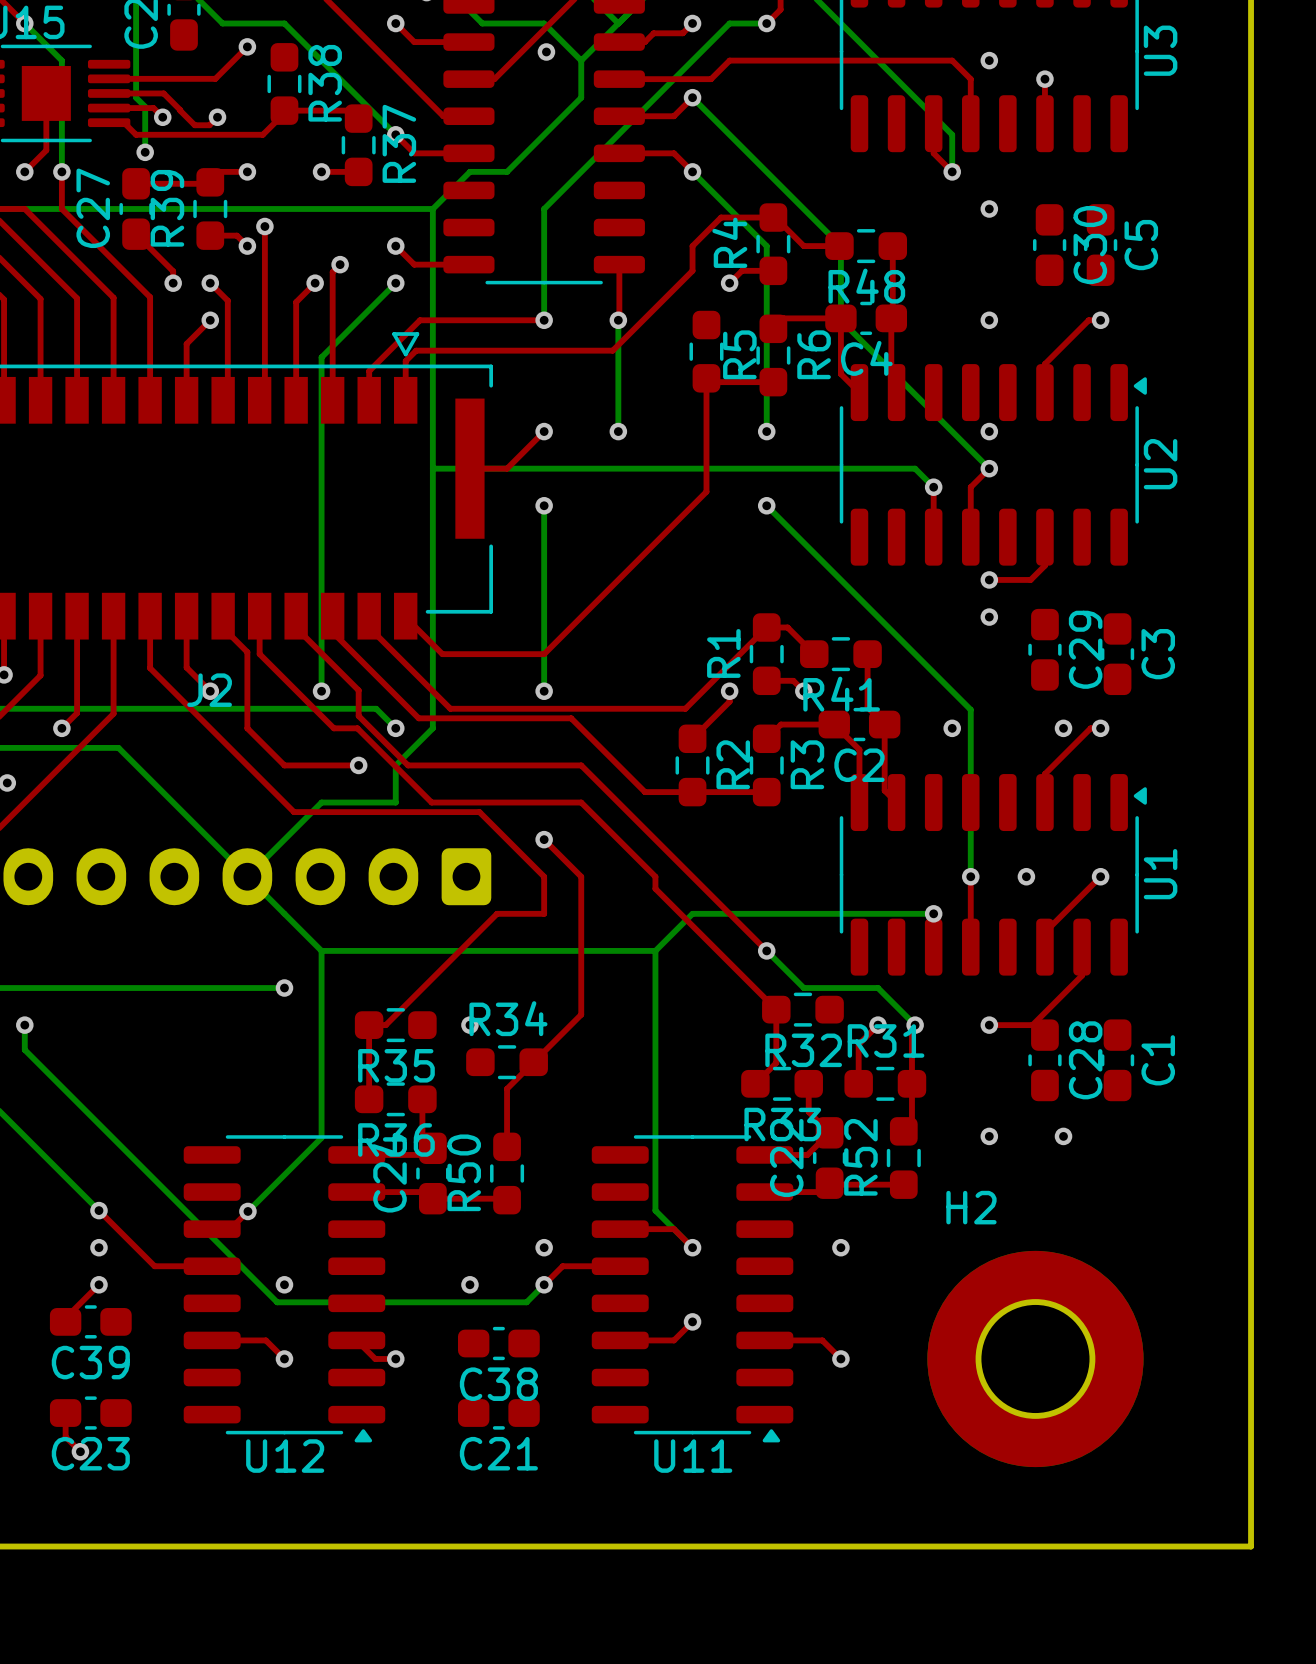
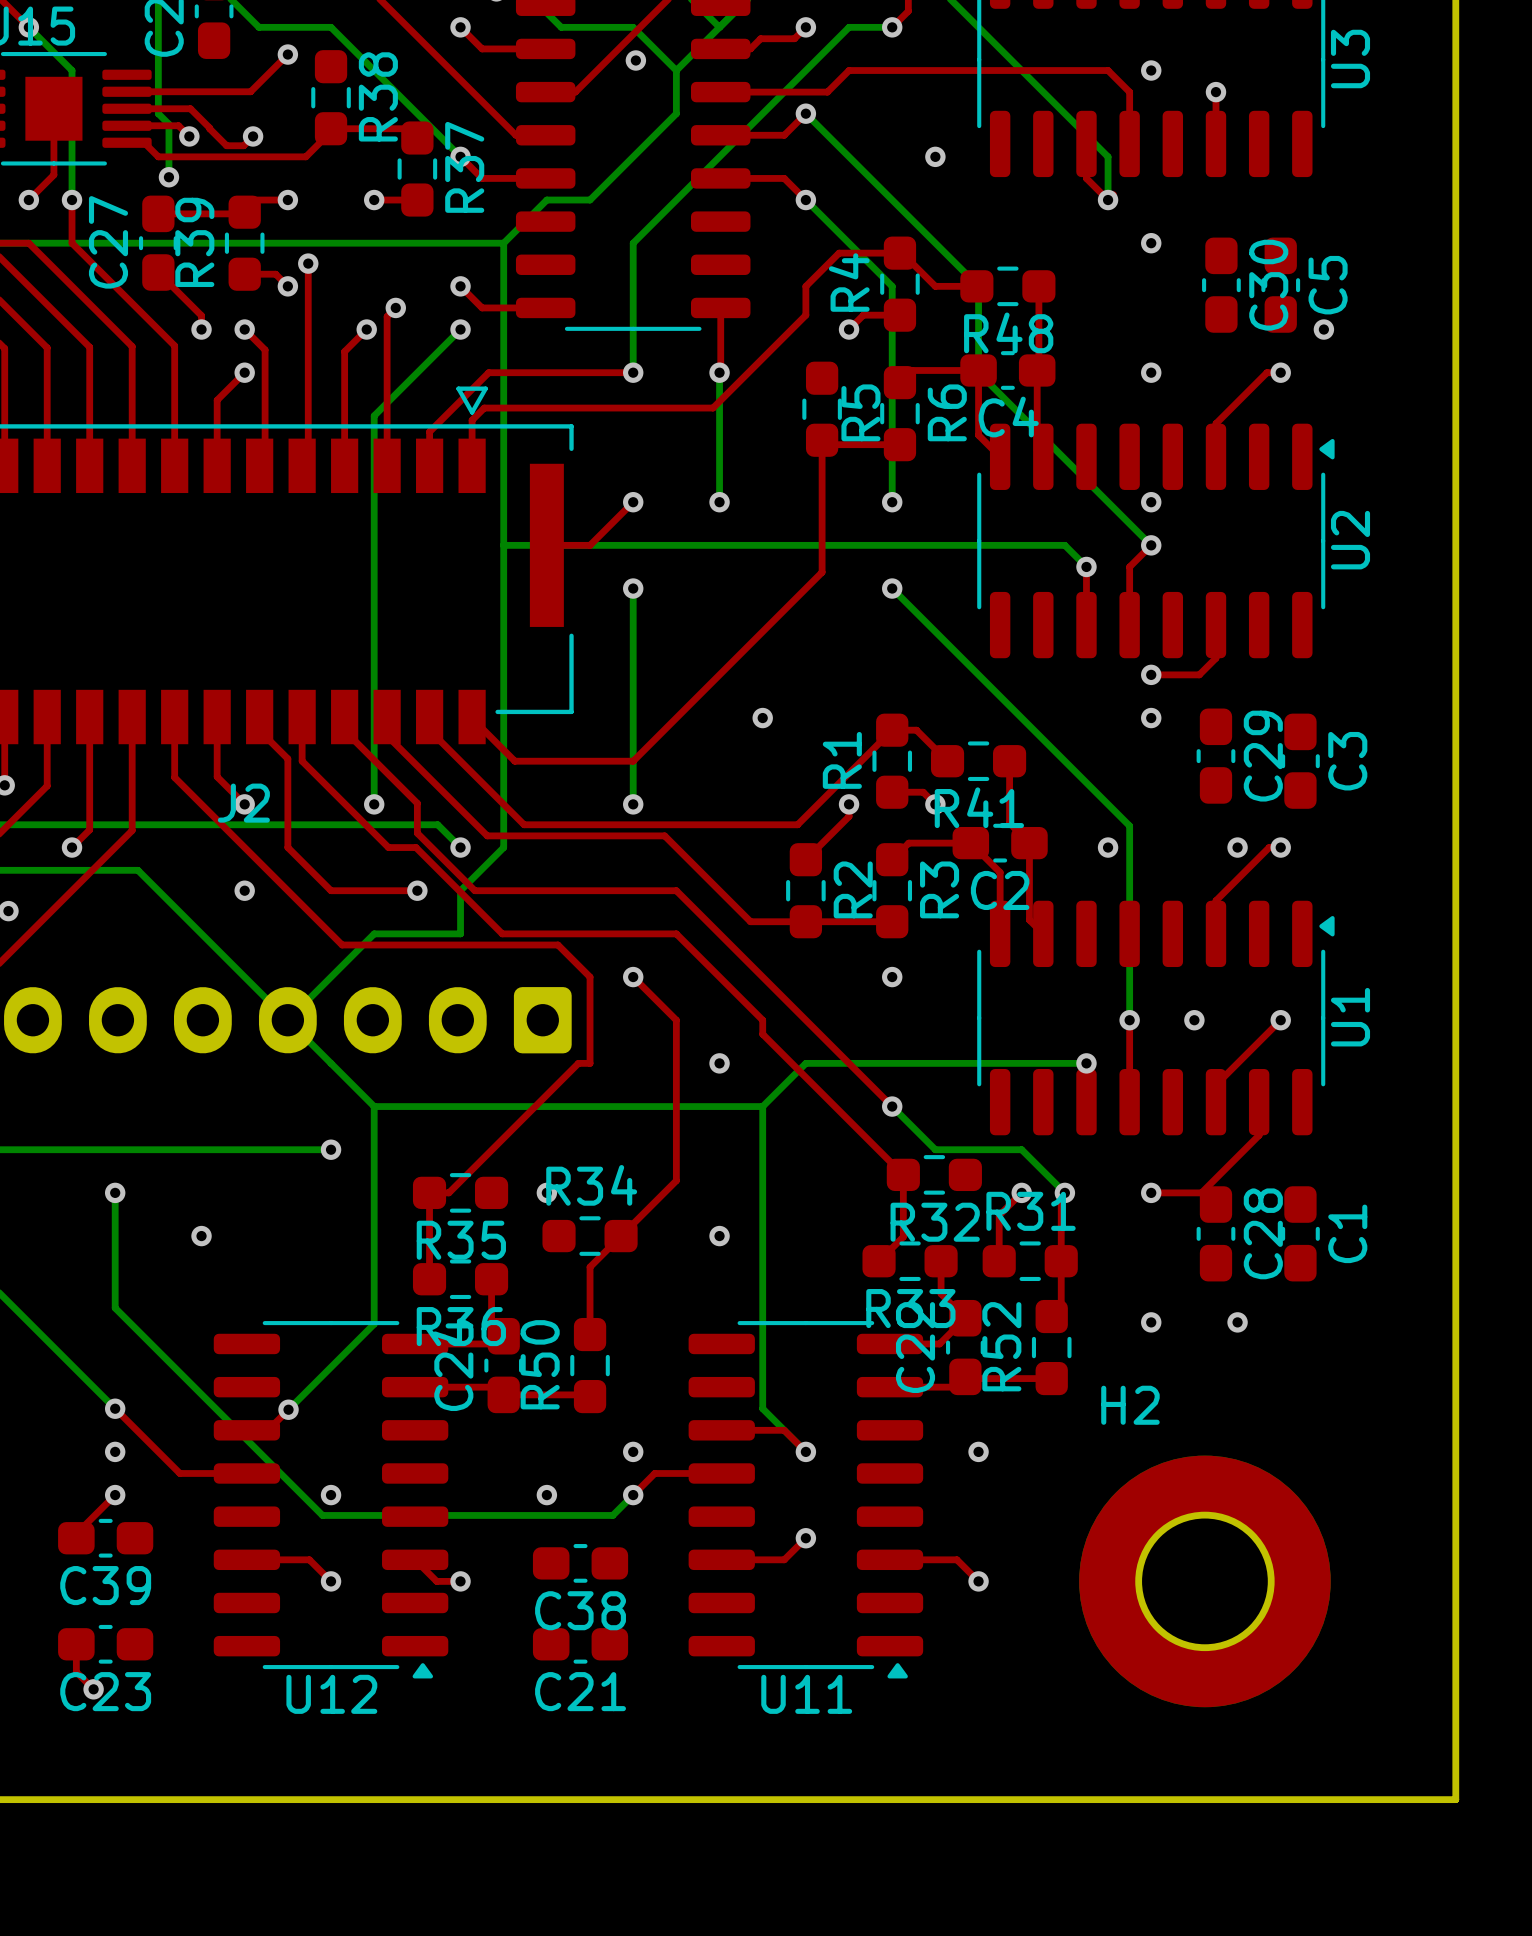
via: none -> (935, 156)
via: none -> (1323, 329)
via: none -> (762, 718)
via: none -> (244, 890)
top track: (507, 839) (544, 876) (544, 913) (507, 913) -> (590, 977) (590, 1063)
via: none -> (892, 977)
via: none -> (719, 1063)
bottom track: (24, 1025) (24, 1049) (98, 1124) -> (115, 1192) (115, 1308)
via position: (24, 1025) -> (115, 1192)
via: none -> (201, 1236)
via: none -> (719, 1236)

